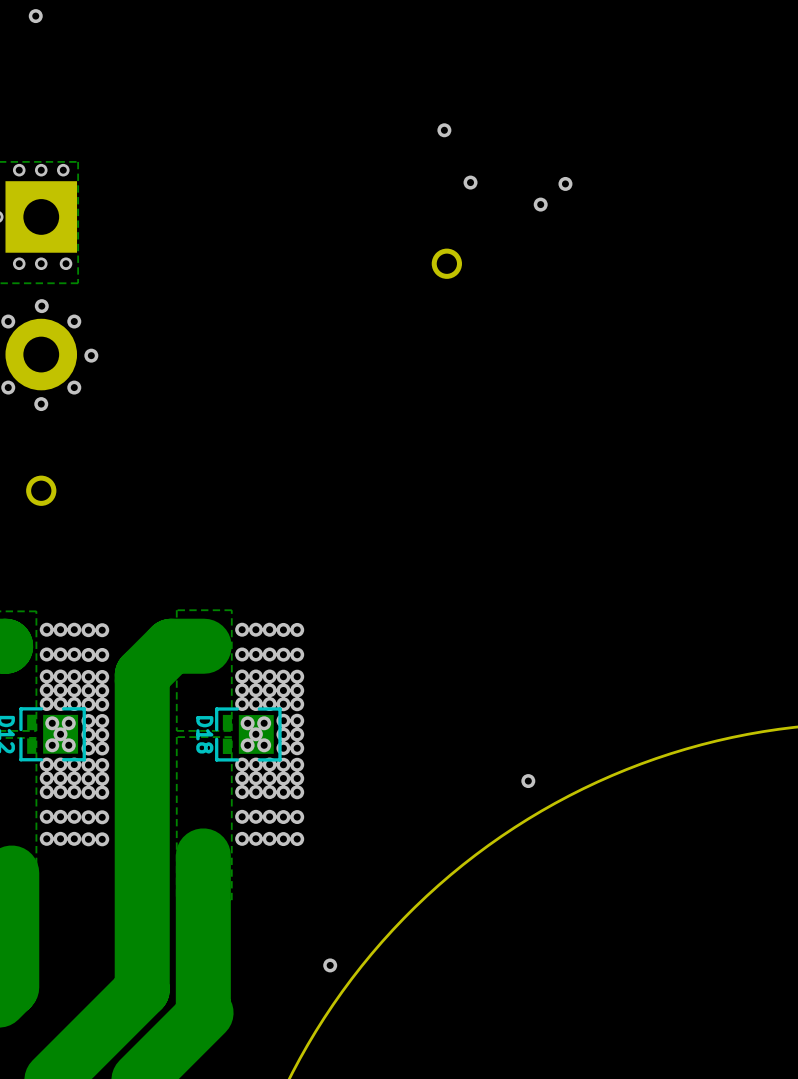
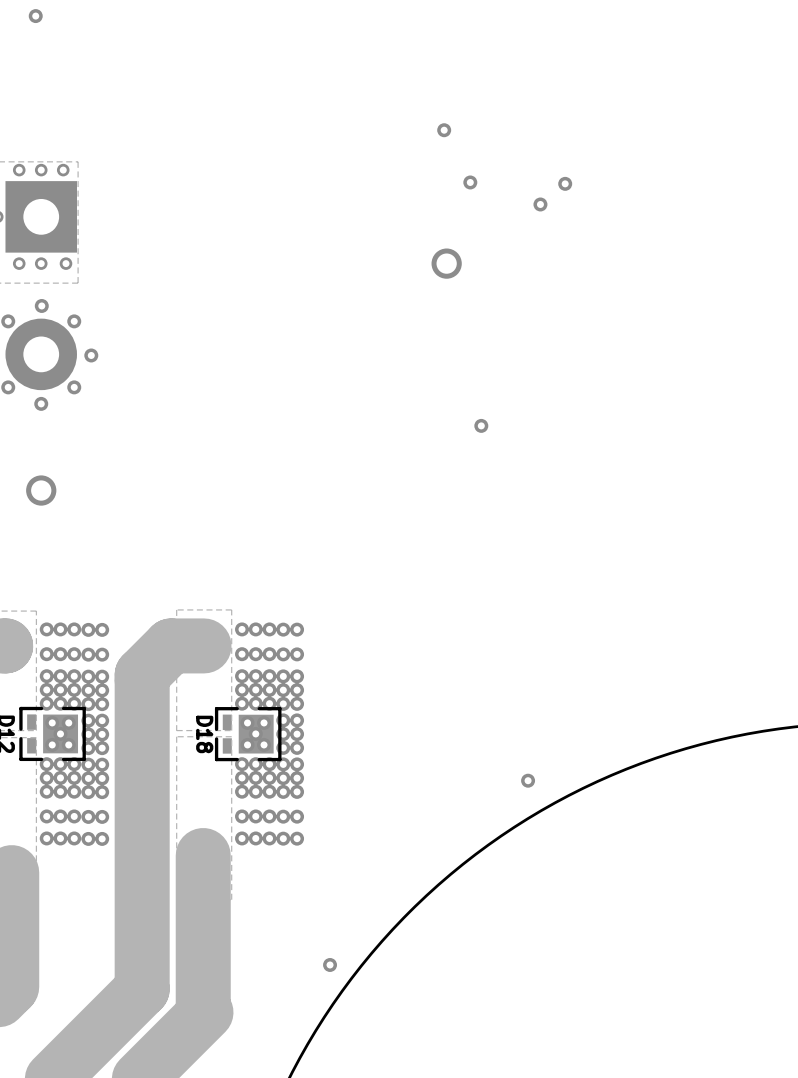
via: none -> (481, 425)

